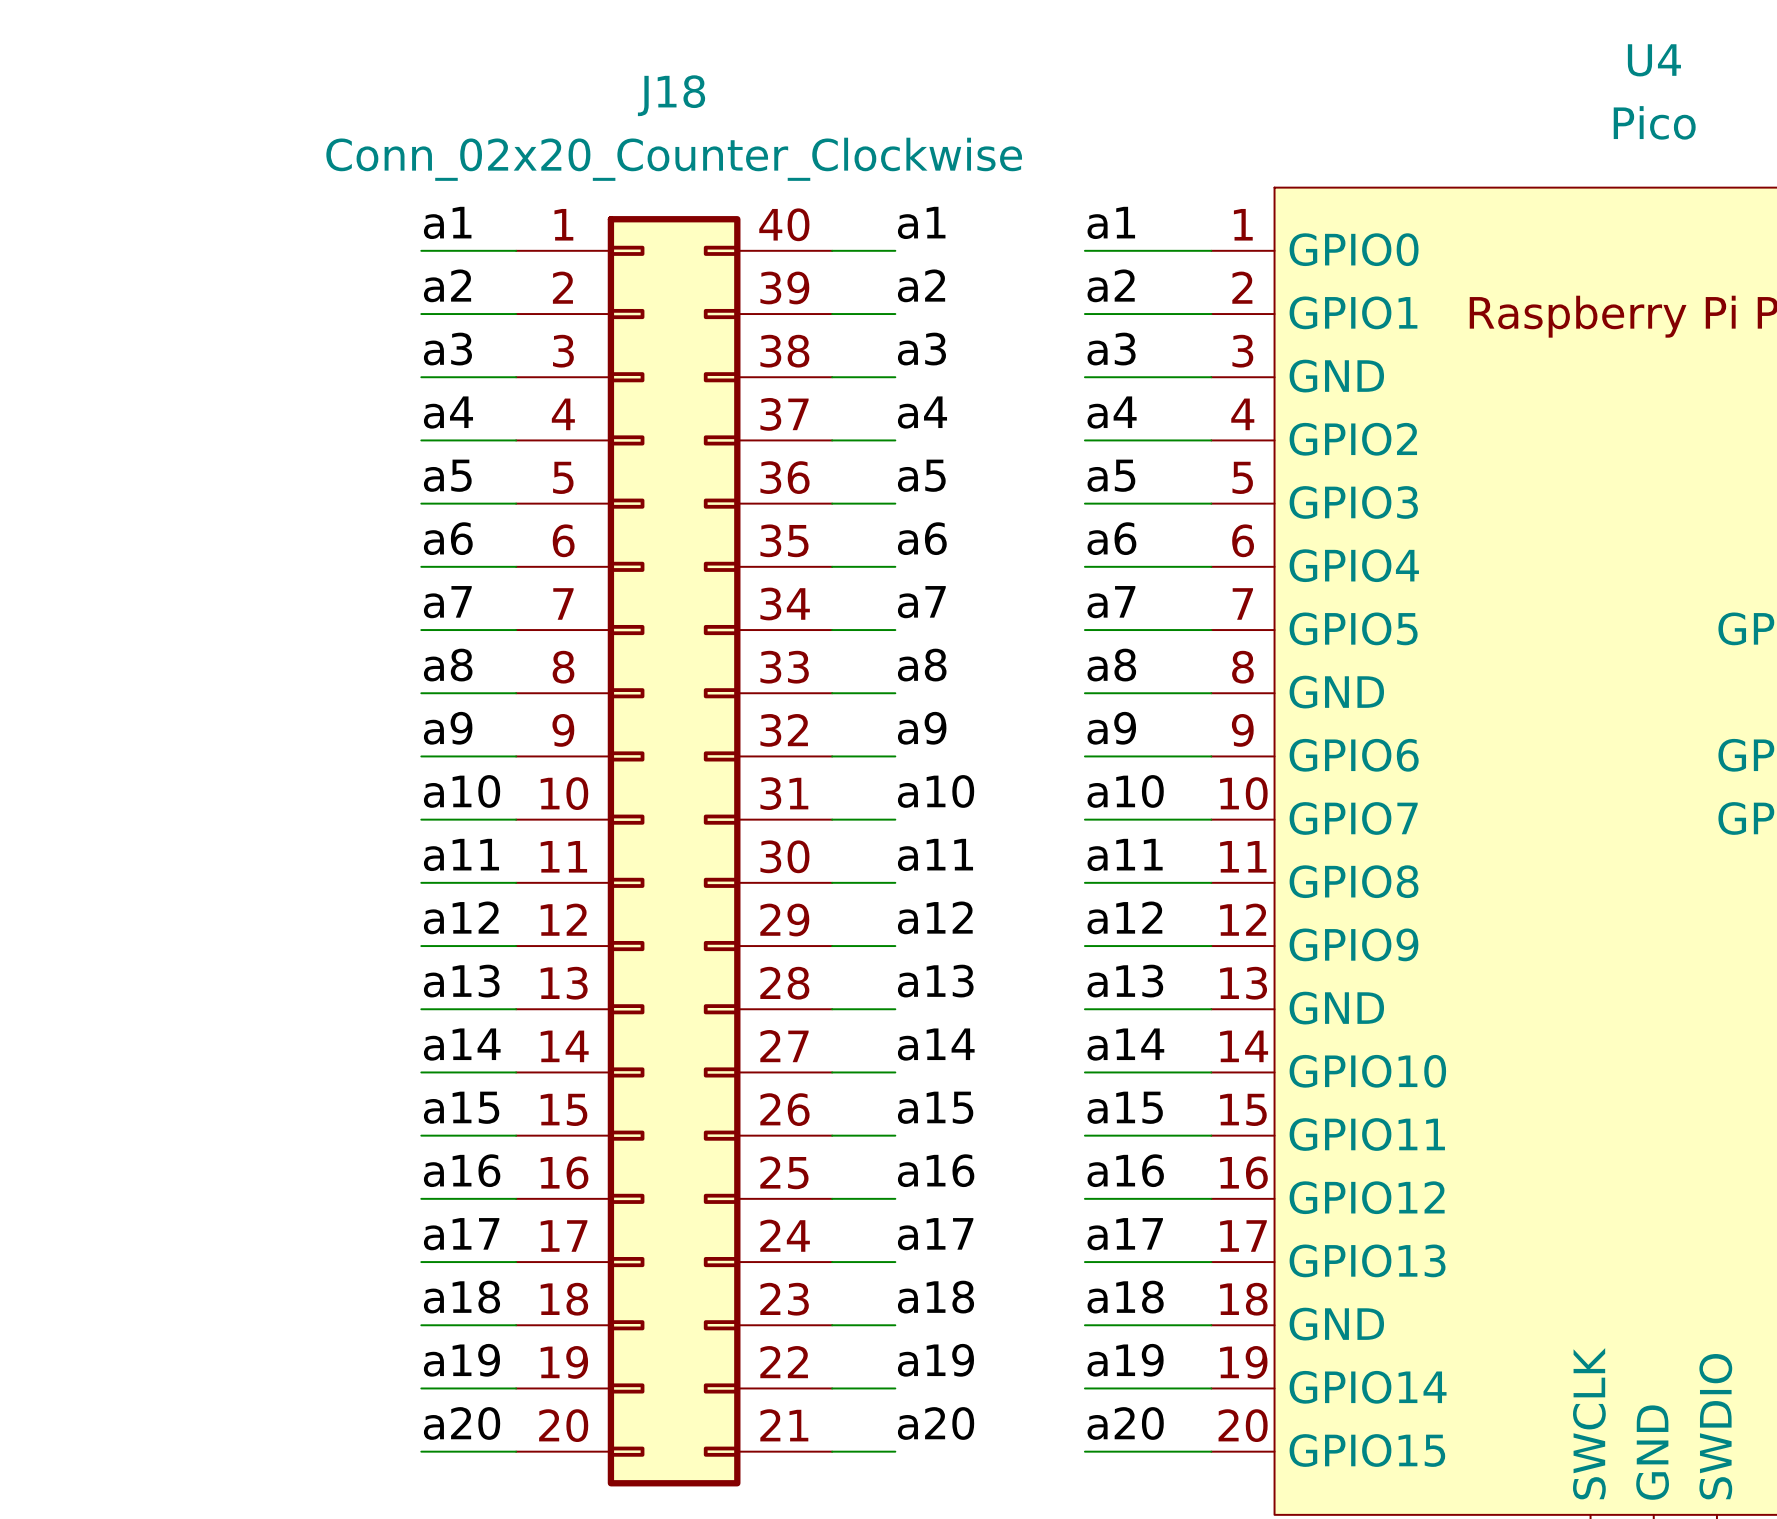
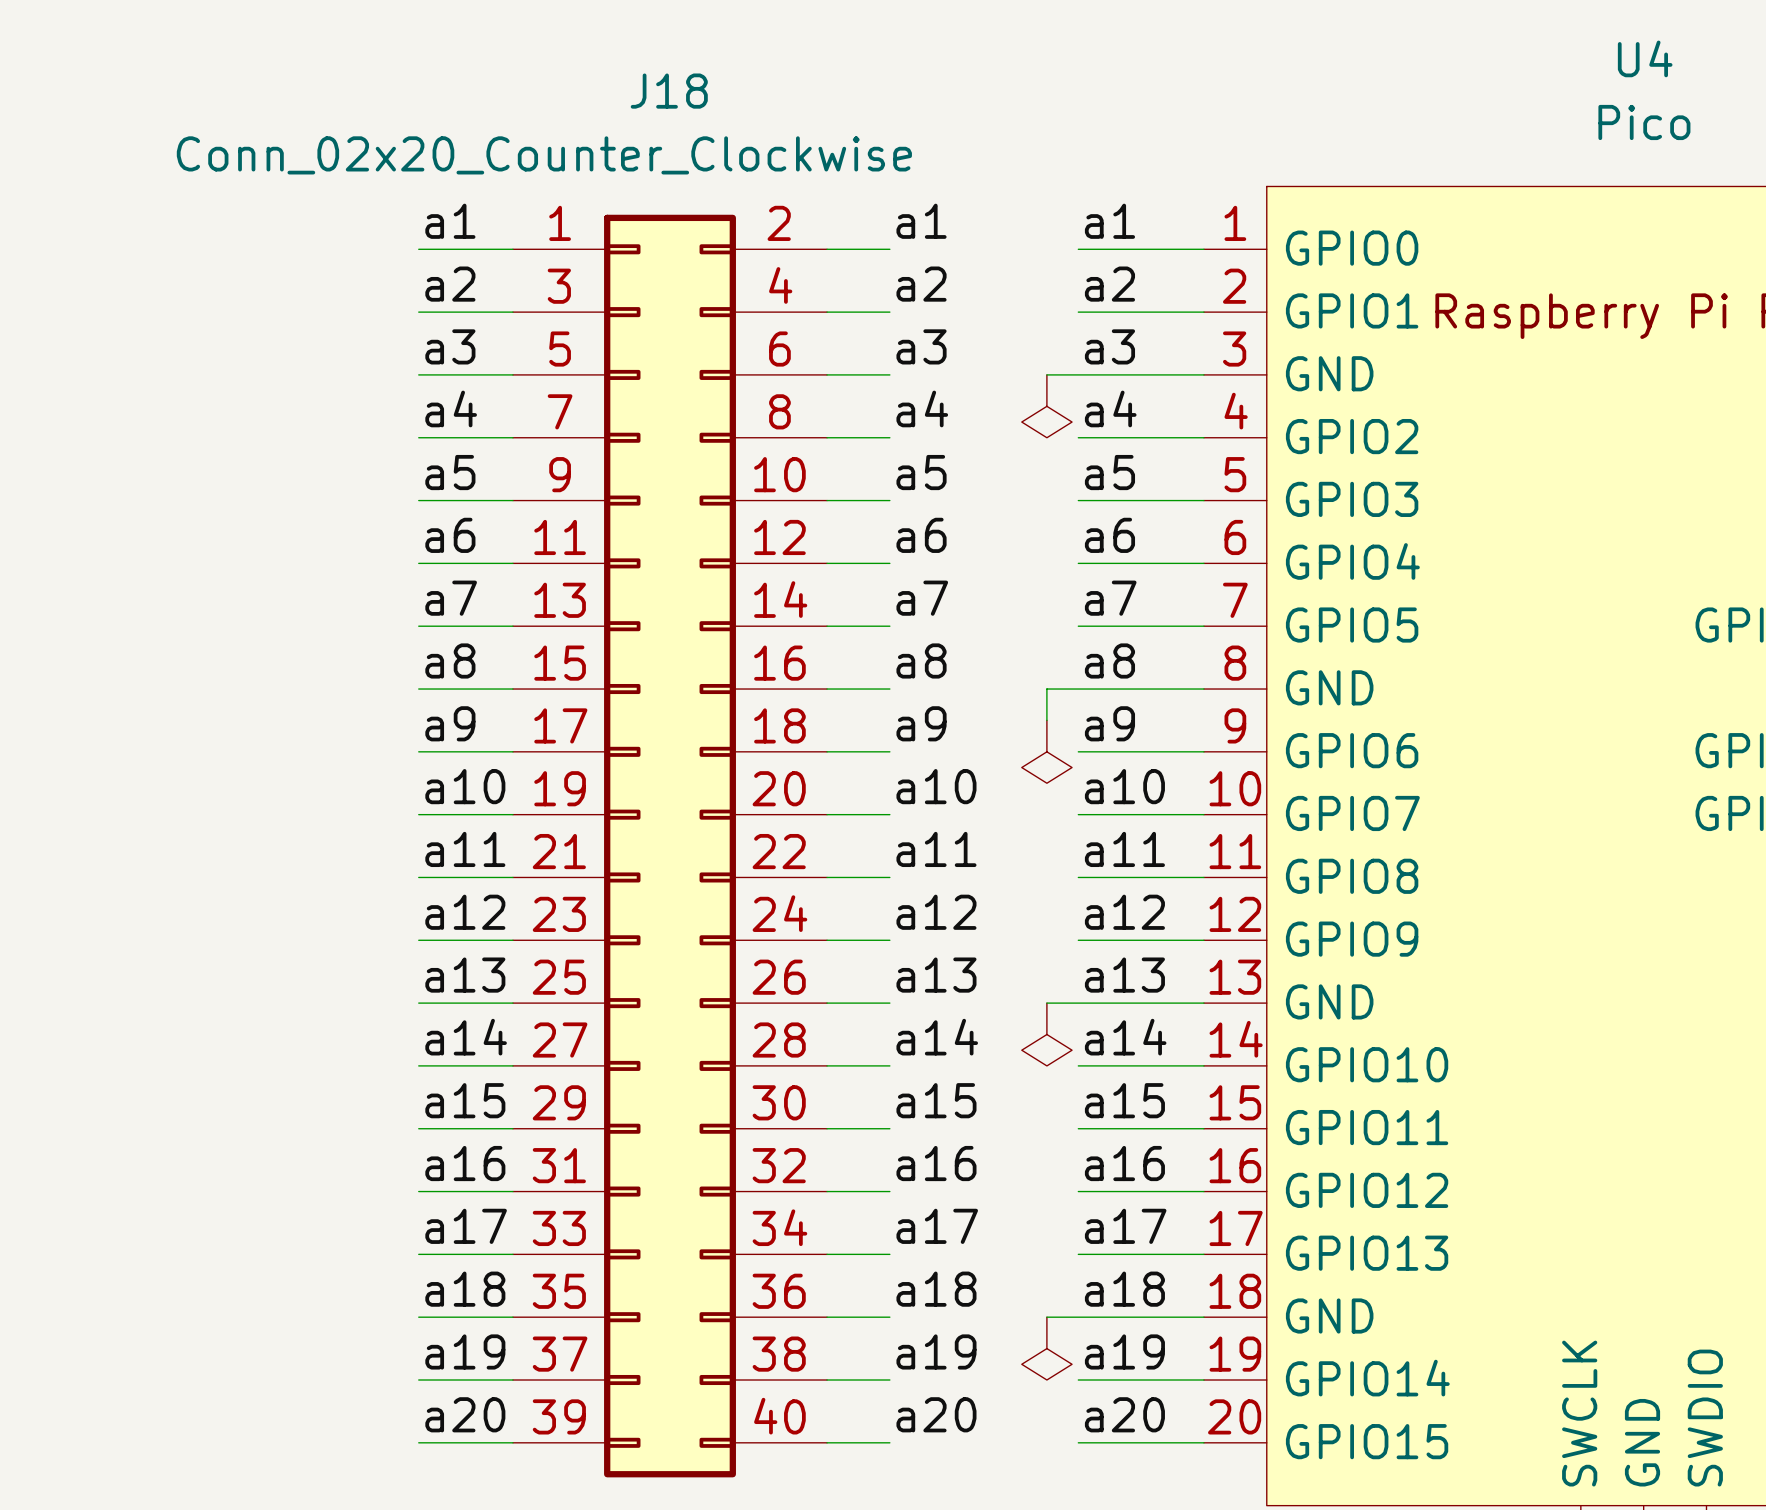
J18 value position: Conn_02x20_Counter_Clockwise (674, 159) -> Conn_02x20_Counter_Clockwise (544, 155)
J18 symbol: [516, 216, 833, 1487] -> [512, 214, 828, 1478]
wire: none -> (1046, 374) (1078, 374)
power symbol: none -> (1046, 406)
wire: none -> (1078, 689) (1046, 689) (1046, 720)
power symbol: none -> (1046, 751)
wire: none -> (1046, 1003) (1078, 1003)
power symbol: none -> (1046, 1034)
wire: none -> (1046, 1317) (1078, 1317)
power symbol: none -> (1046, 1348)

